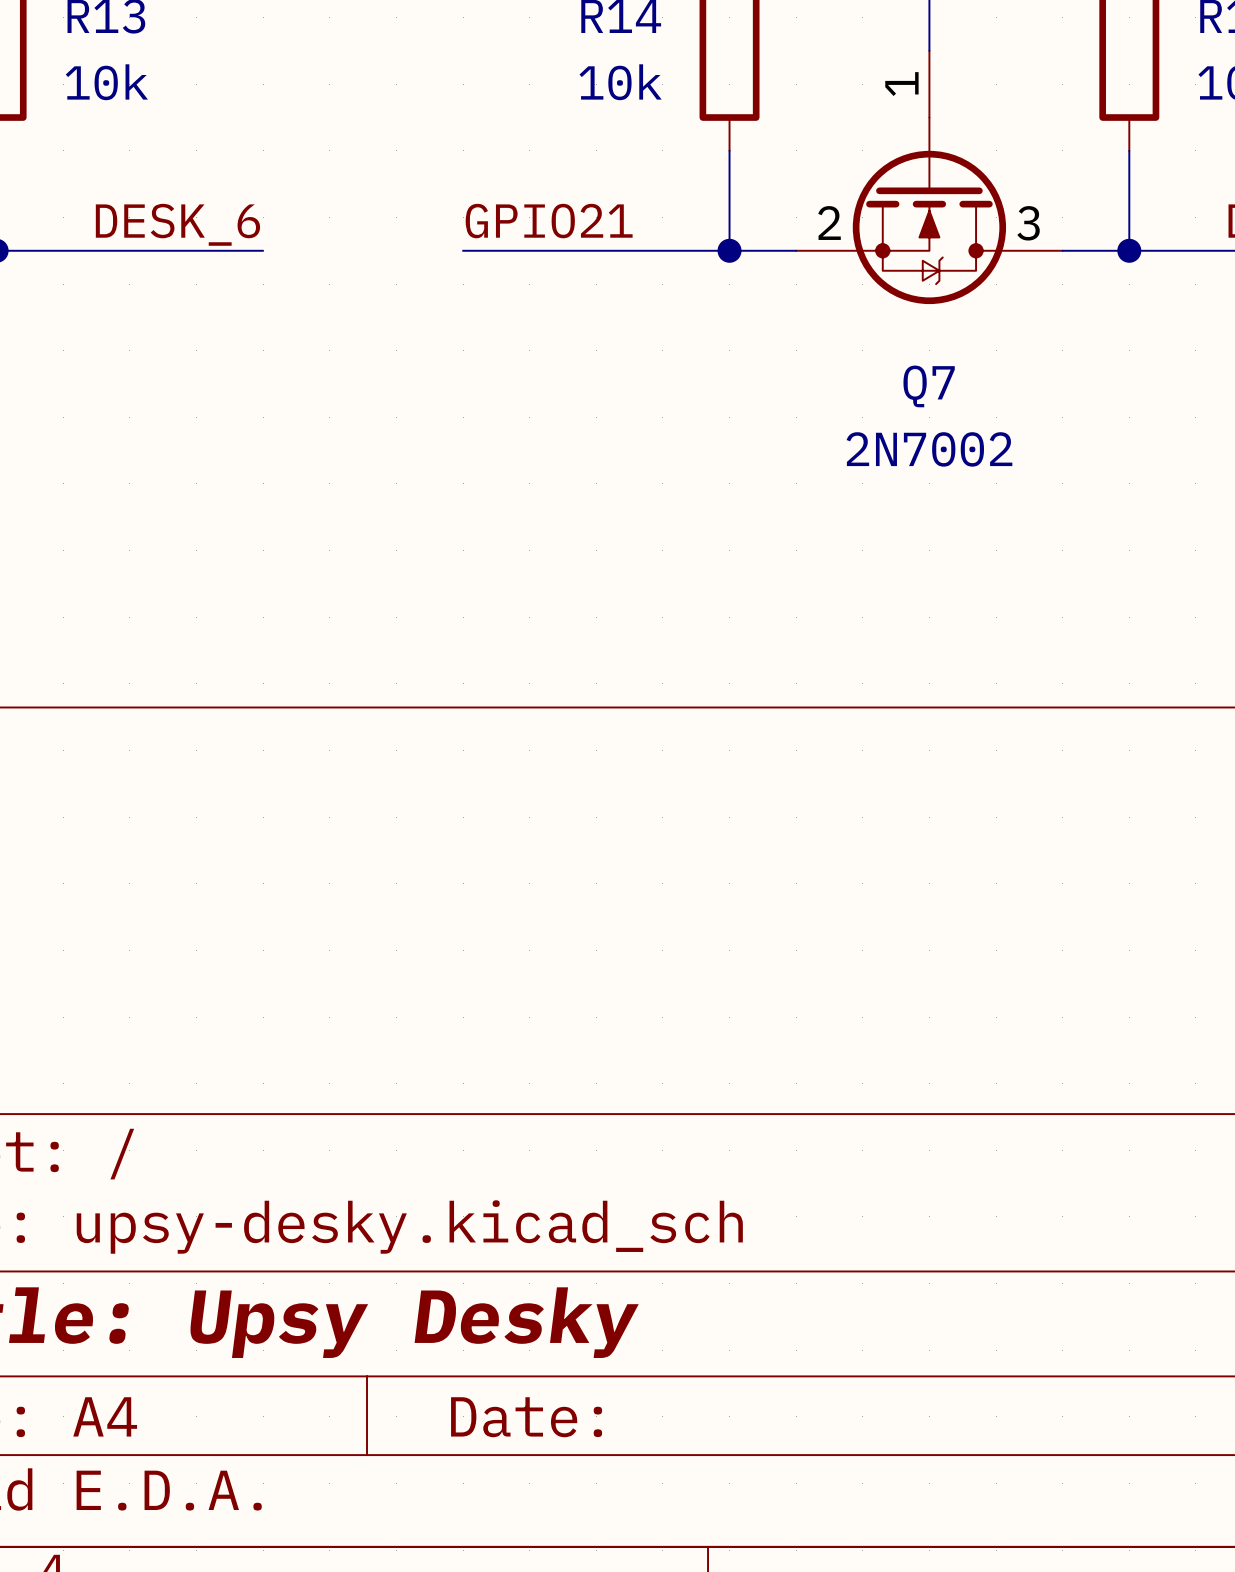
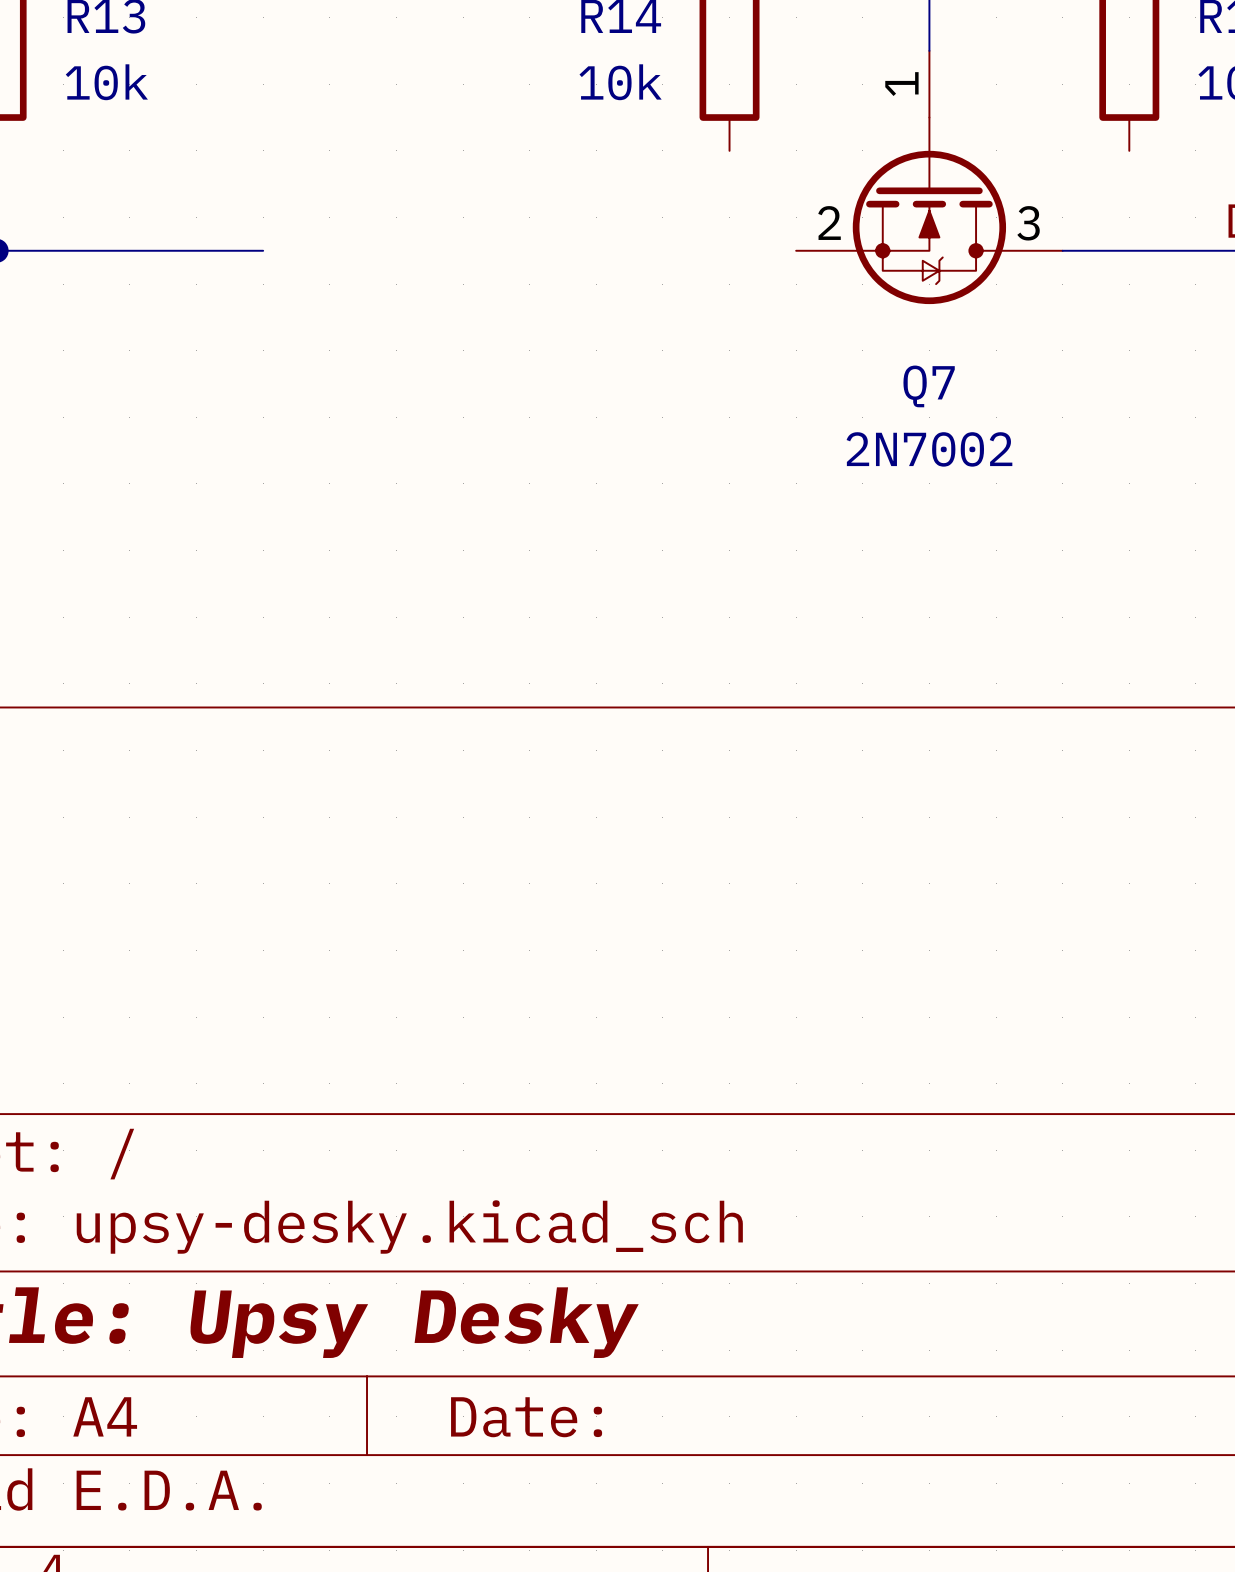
wire: (729, 150) (729, 250) -> none
wire: (1129, 150) (1129, 250) -> none
label: GPIO21 (549, 221) -> none
label: DESK_6 (177, 224) -> none
wire: (463, 250) (796, 250) -> none
junction: (729, 250) -> none
junction: (1129, 250) -> none

